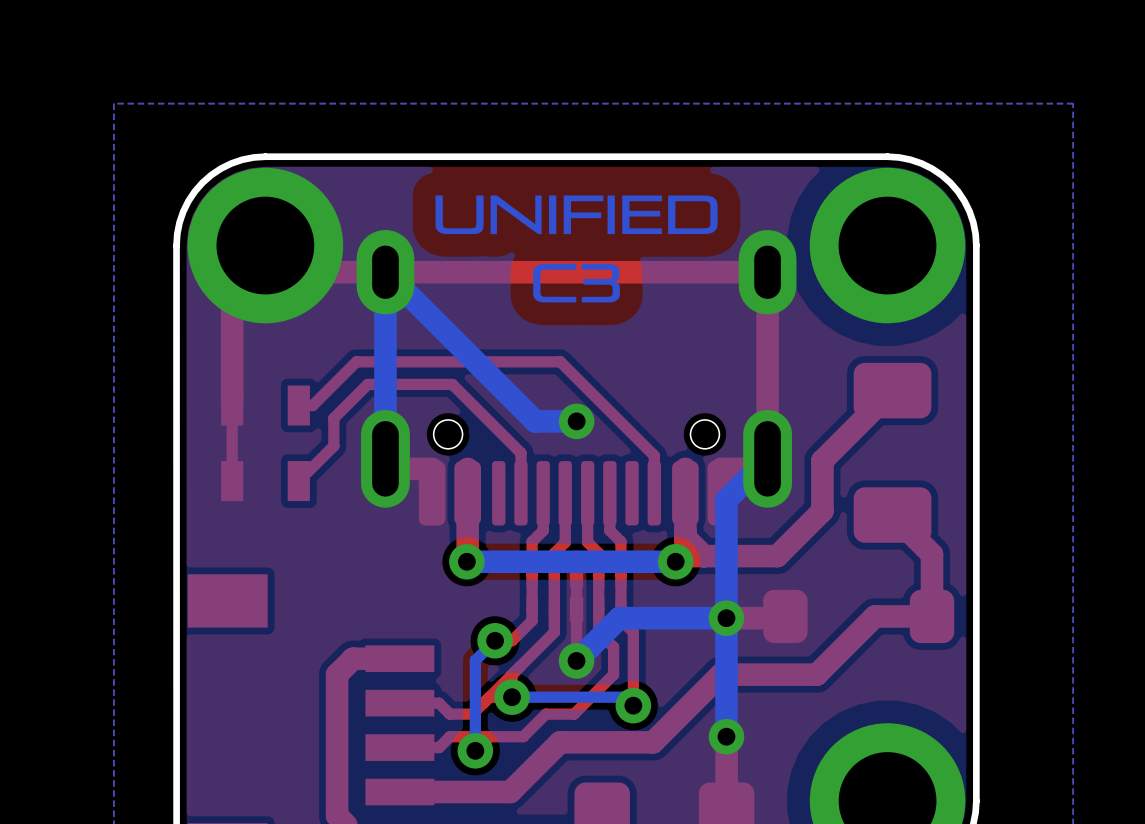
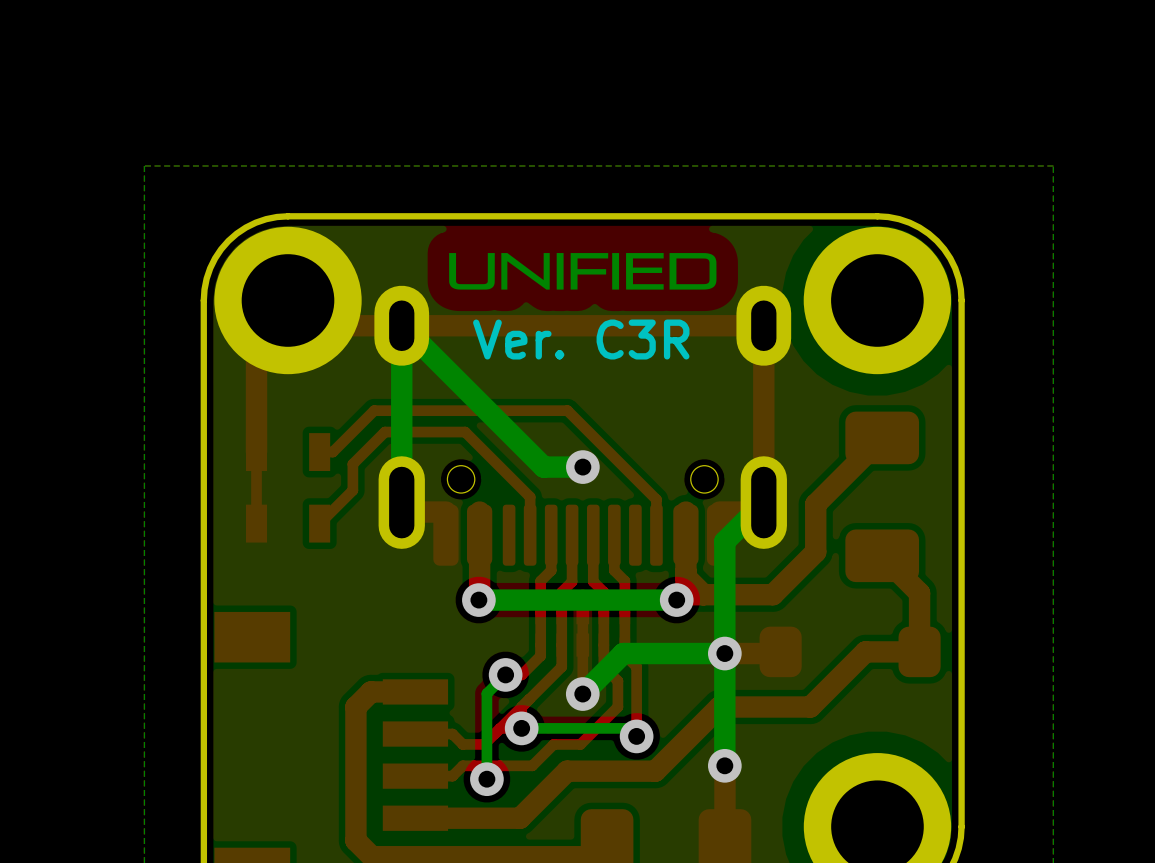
part footprint: [435, 195, 718, 303] -> [449, 253, 717, 290]
text: none -> Ver. C3R (581, 339)

